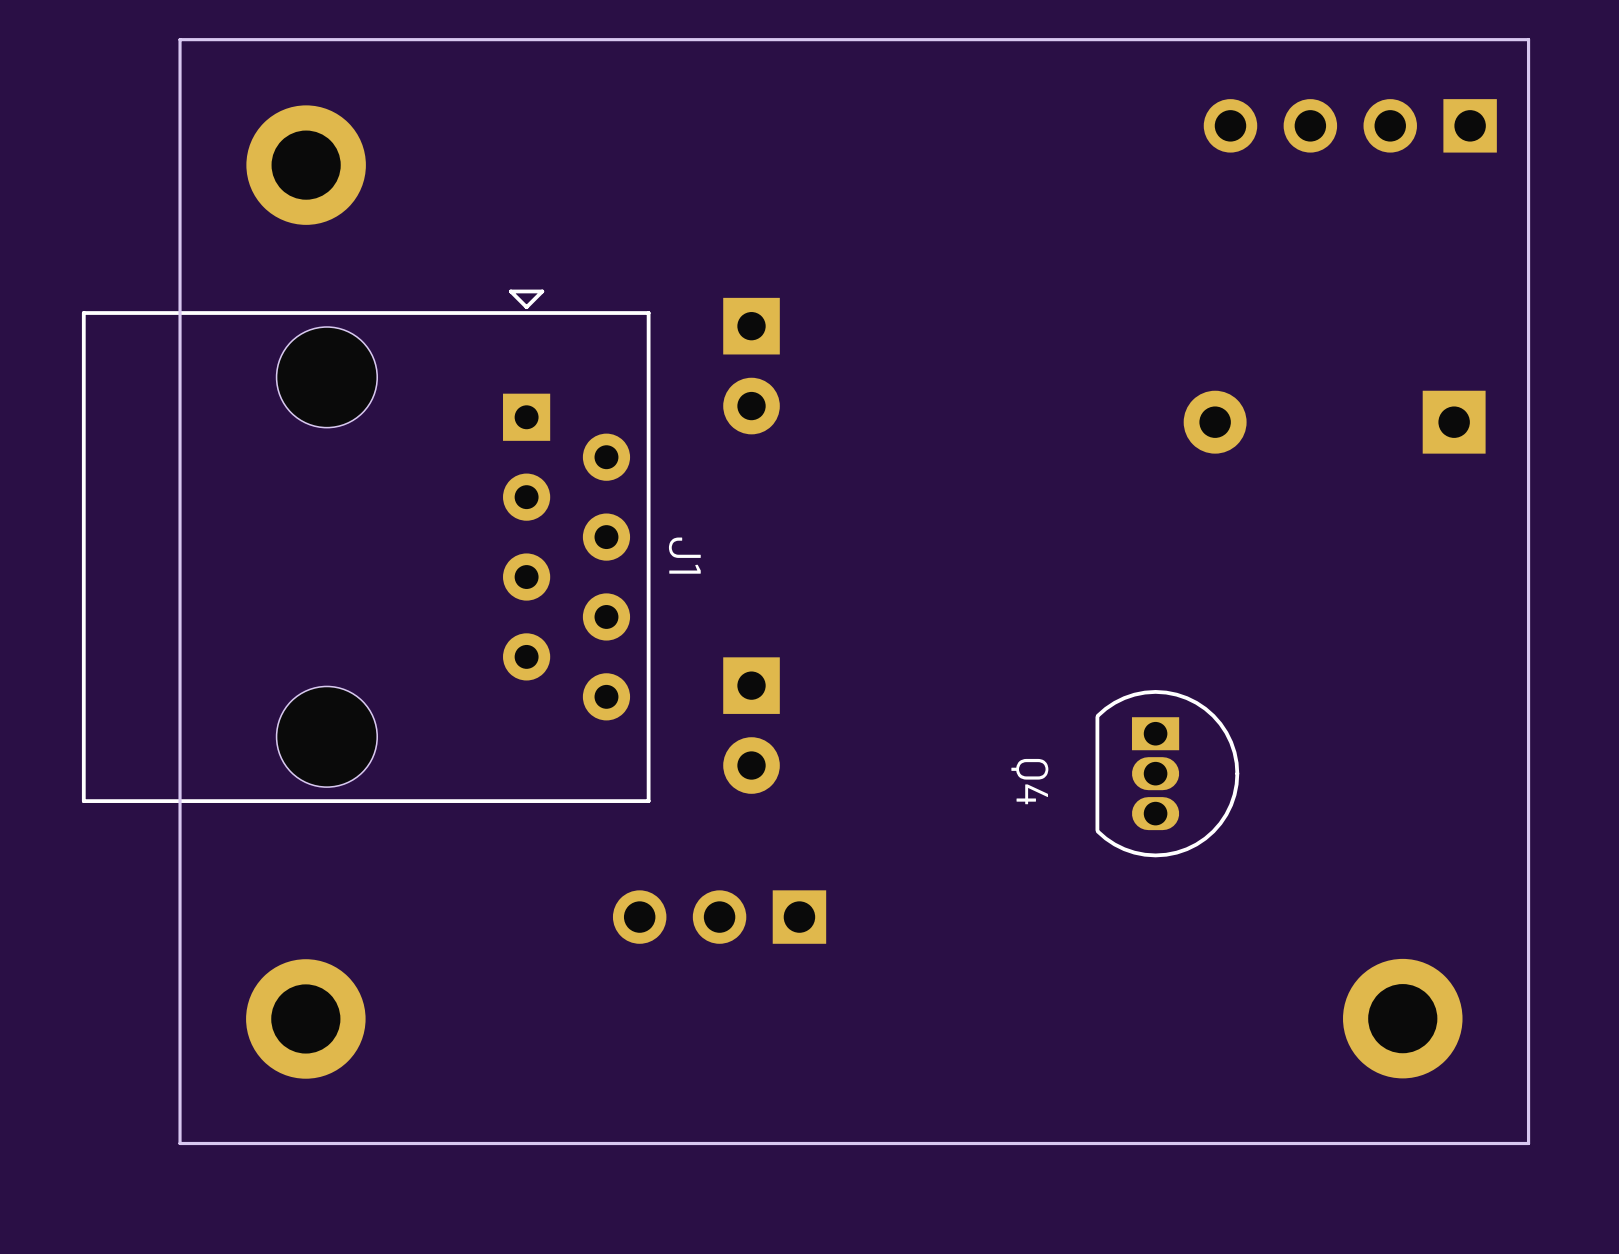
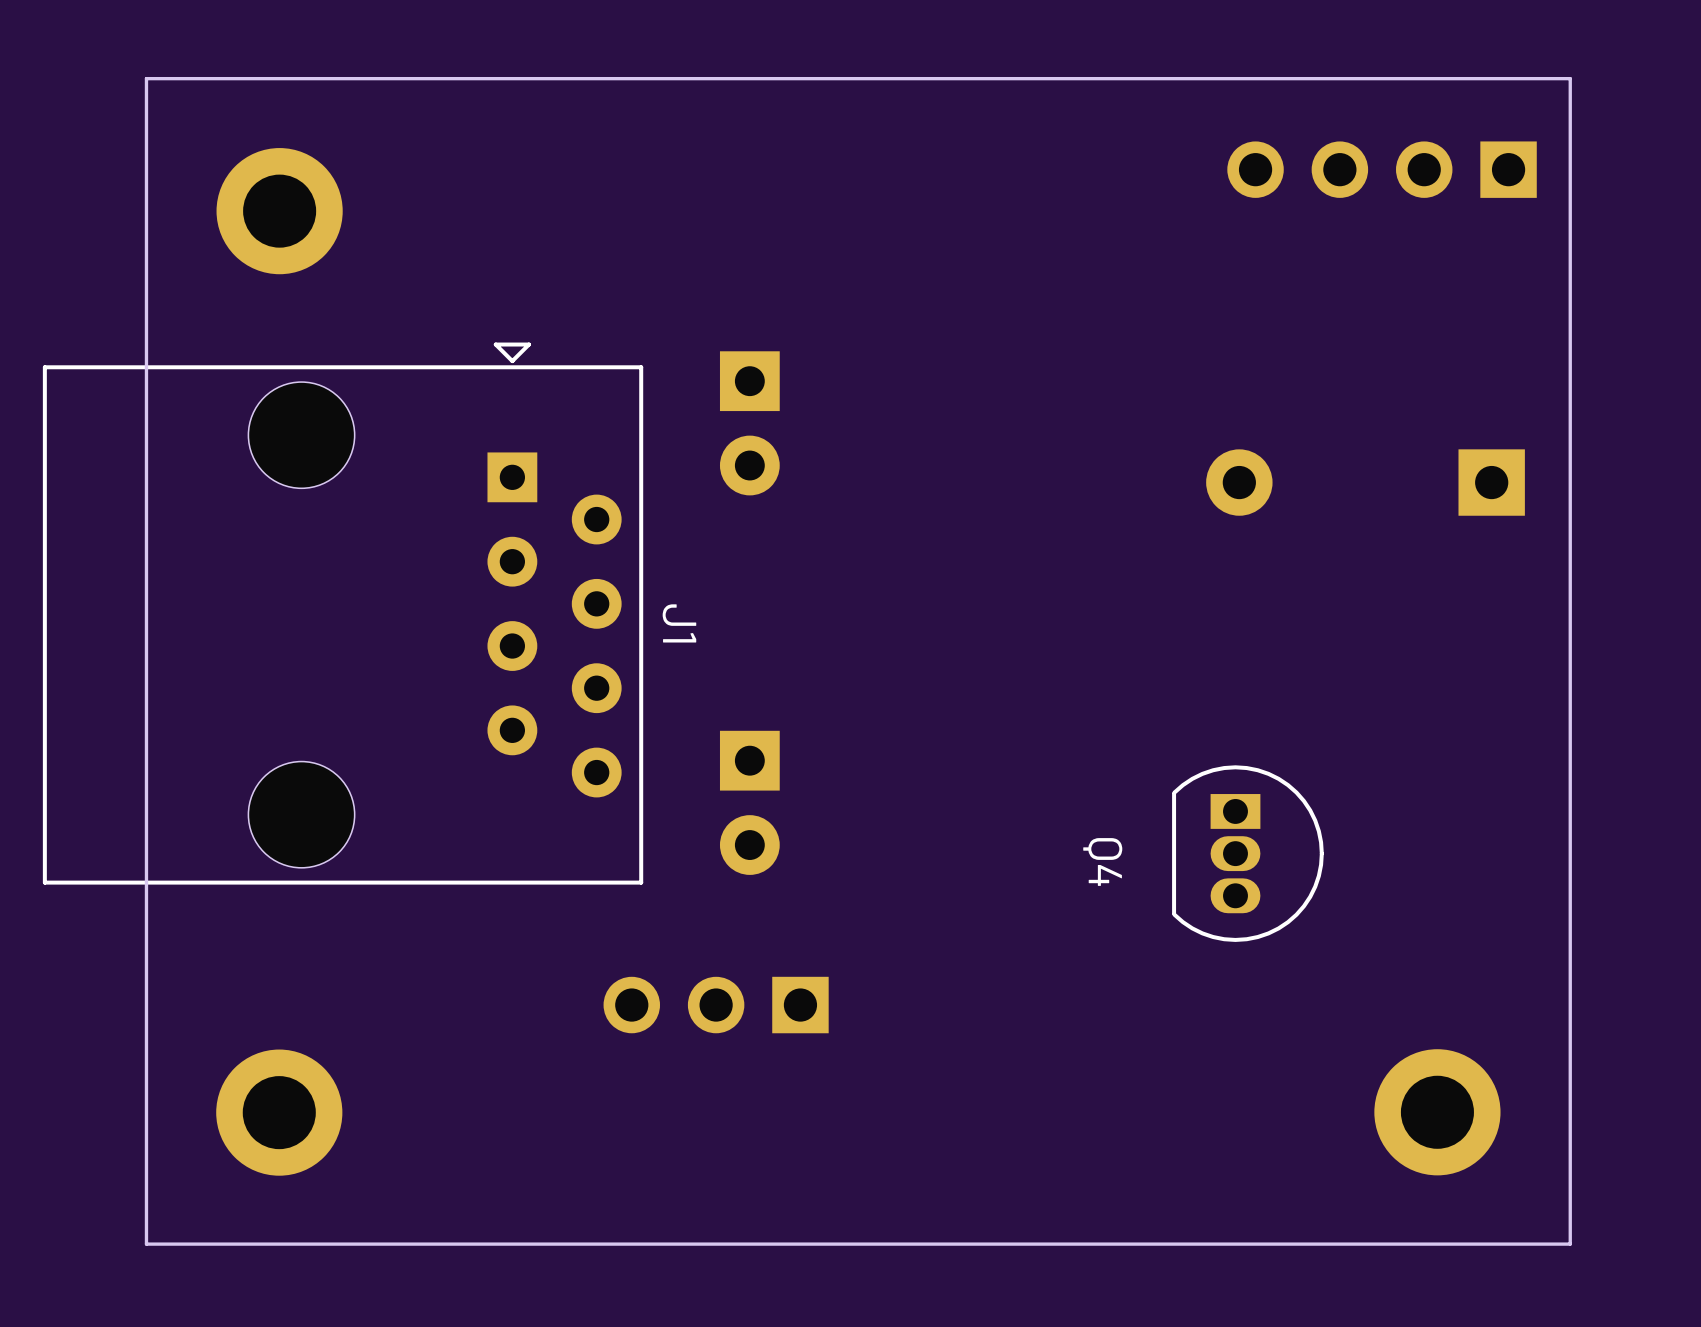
Q4 position: (1167, 773) -> (1247, 853)

